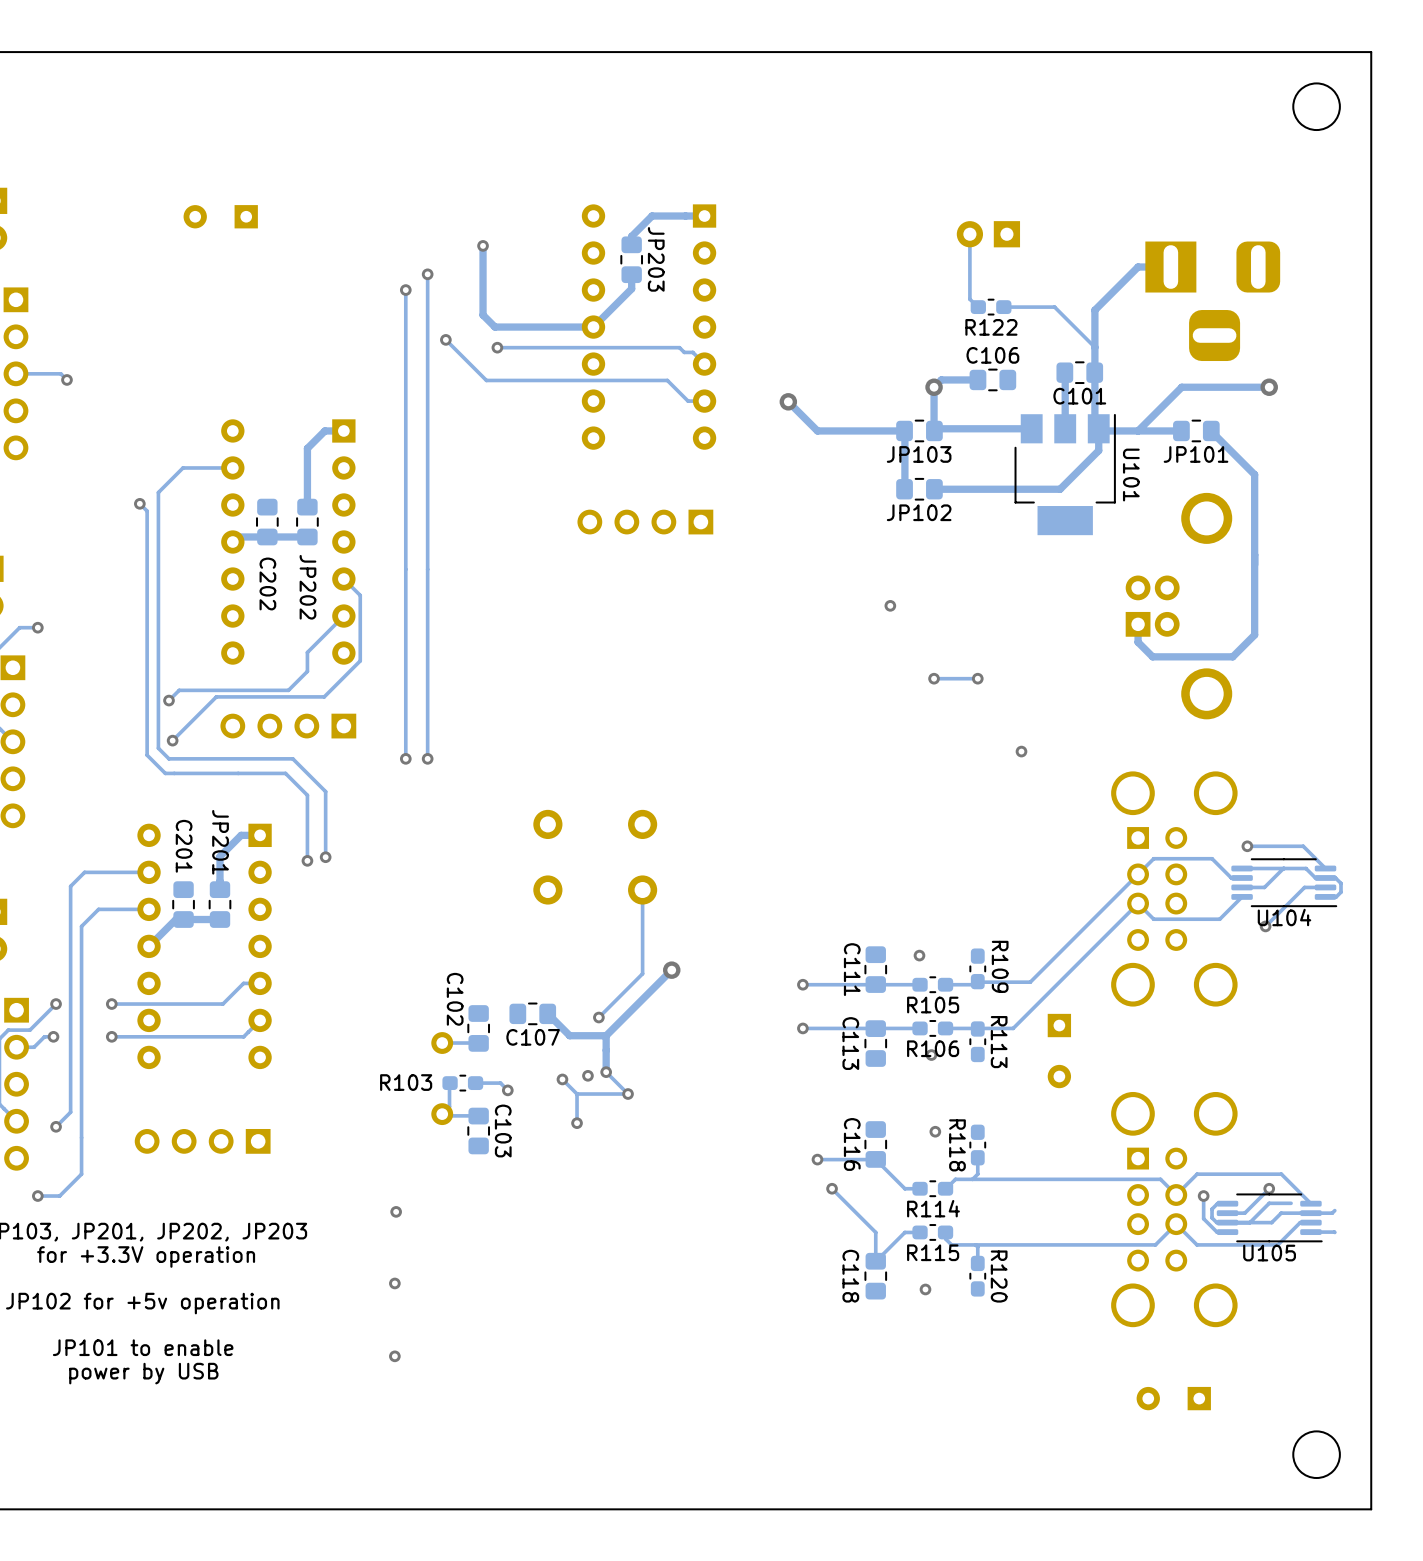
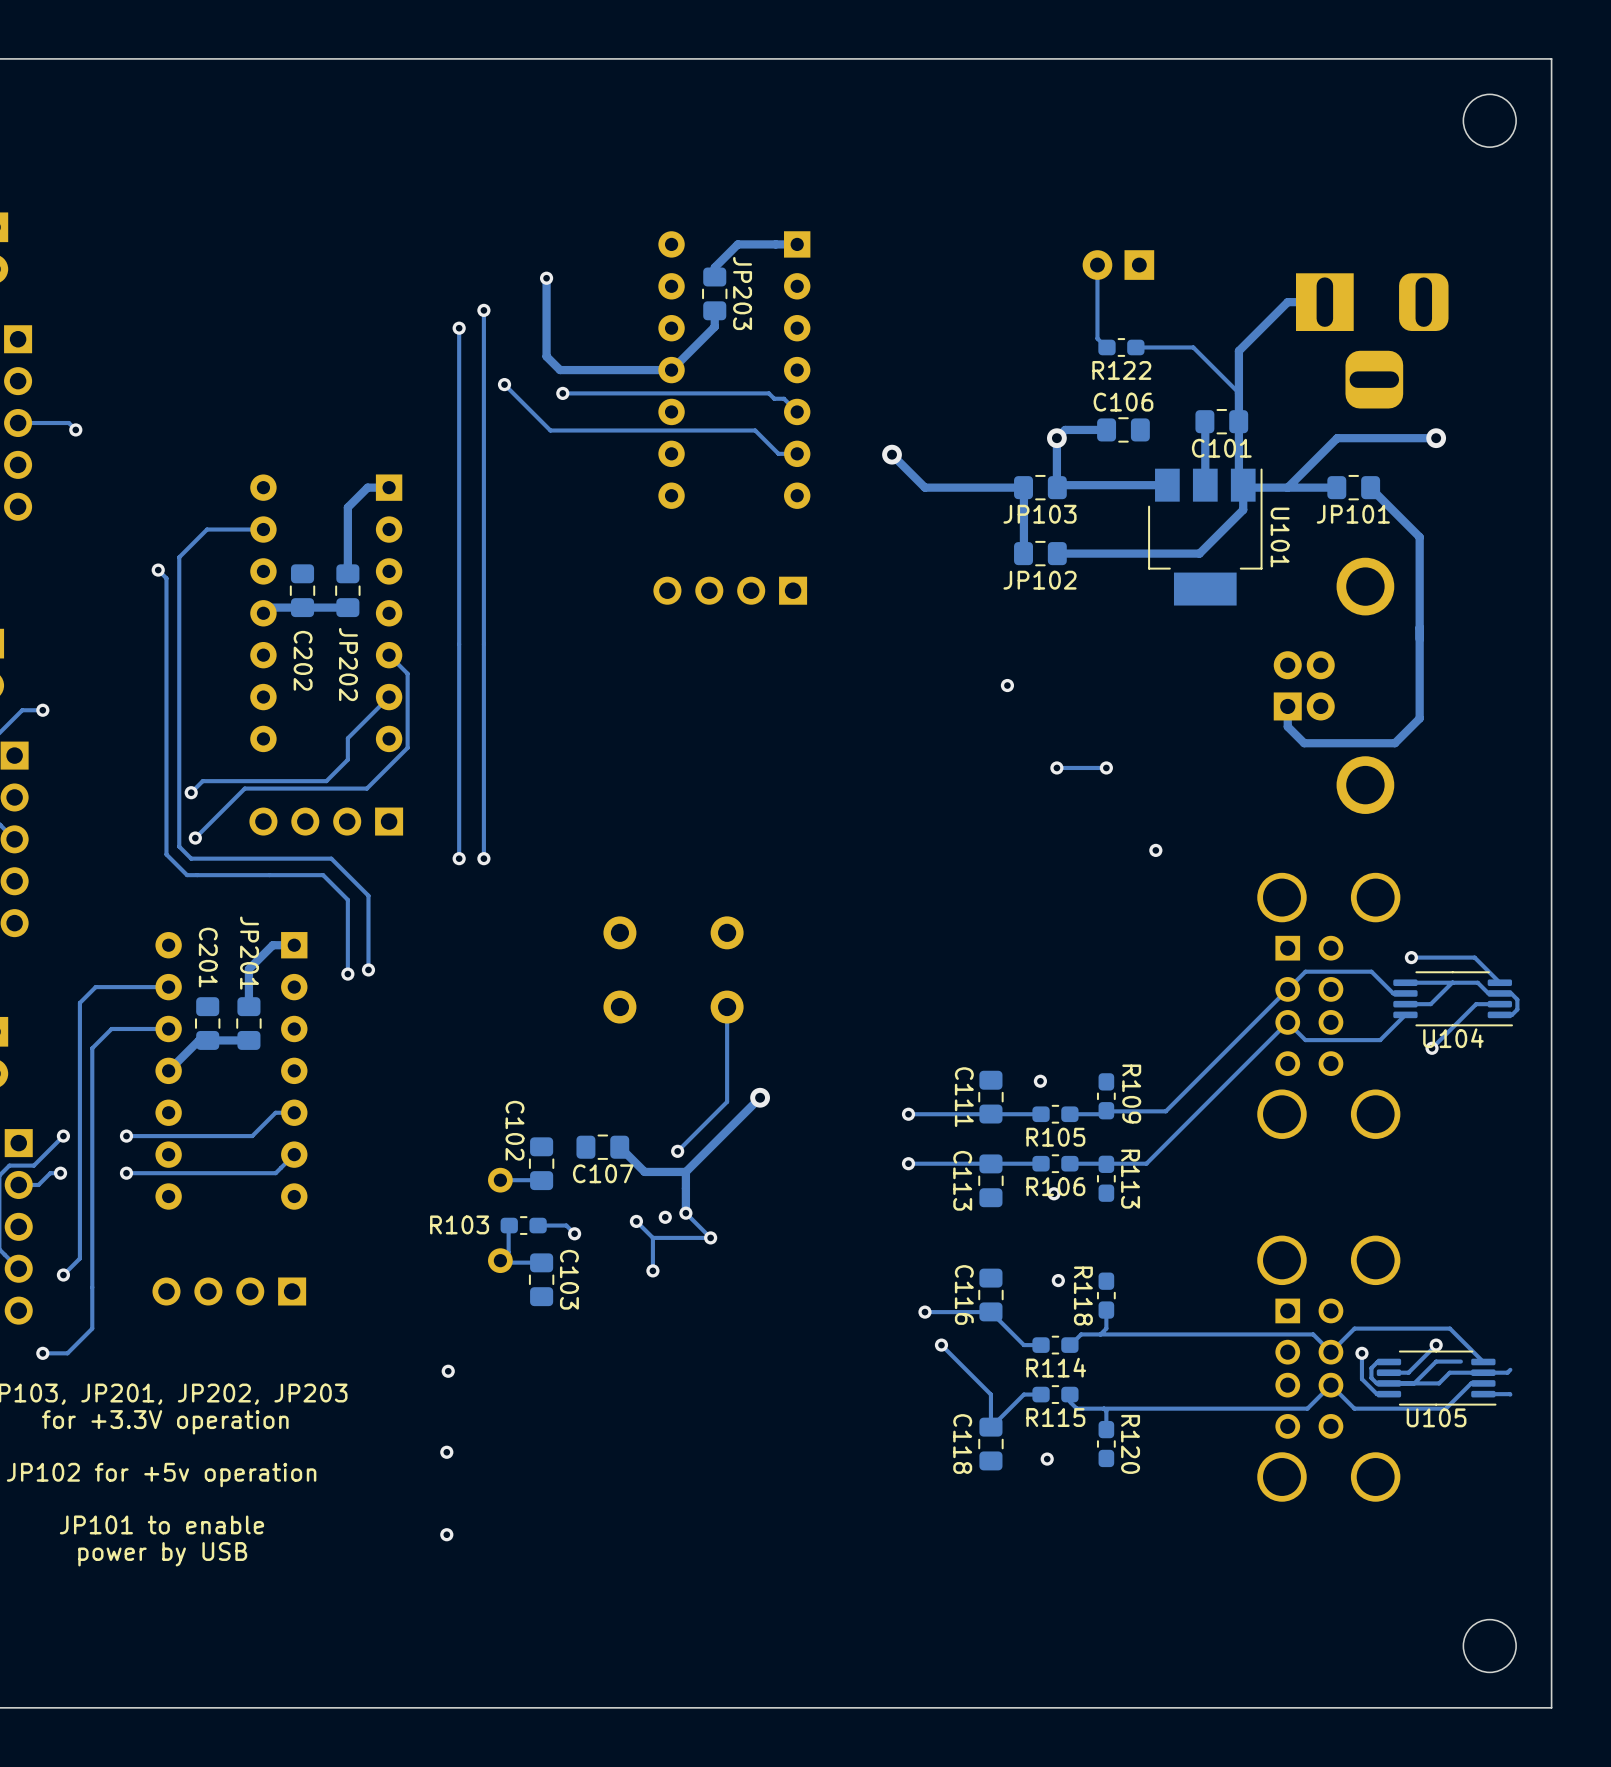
part: (220, 216) -> none
part: (1059, 1051) -> none
part: (1173, 1398) -> none

